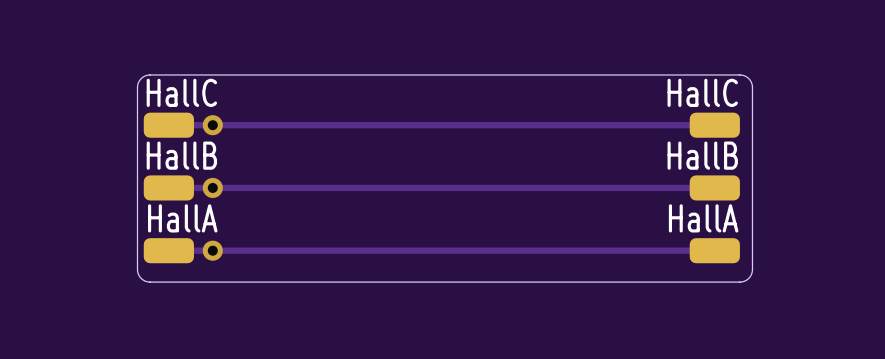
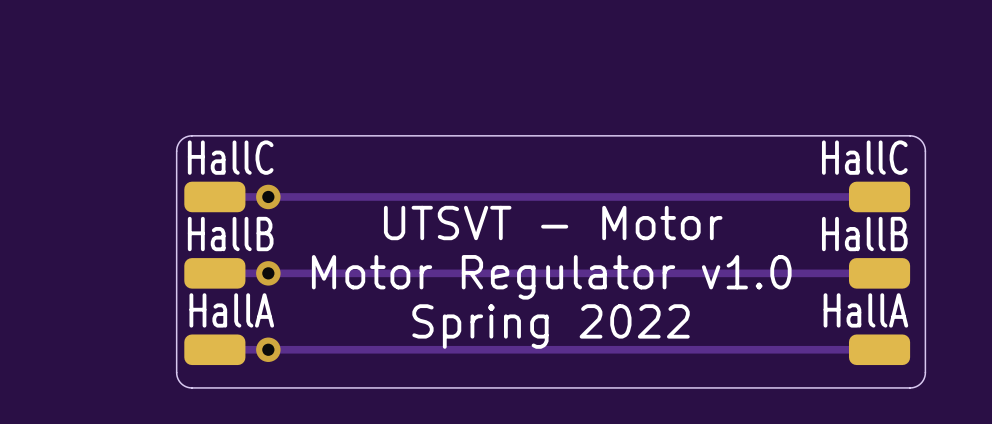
text: none -> UTSVT - Motor (553, 223)
text: none -> Motor Regulator v1.0 (551, 277)
text: none -> Spring 2022 (551, 326)

